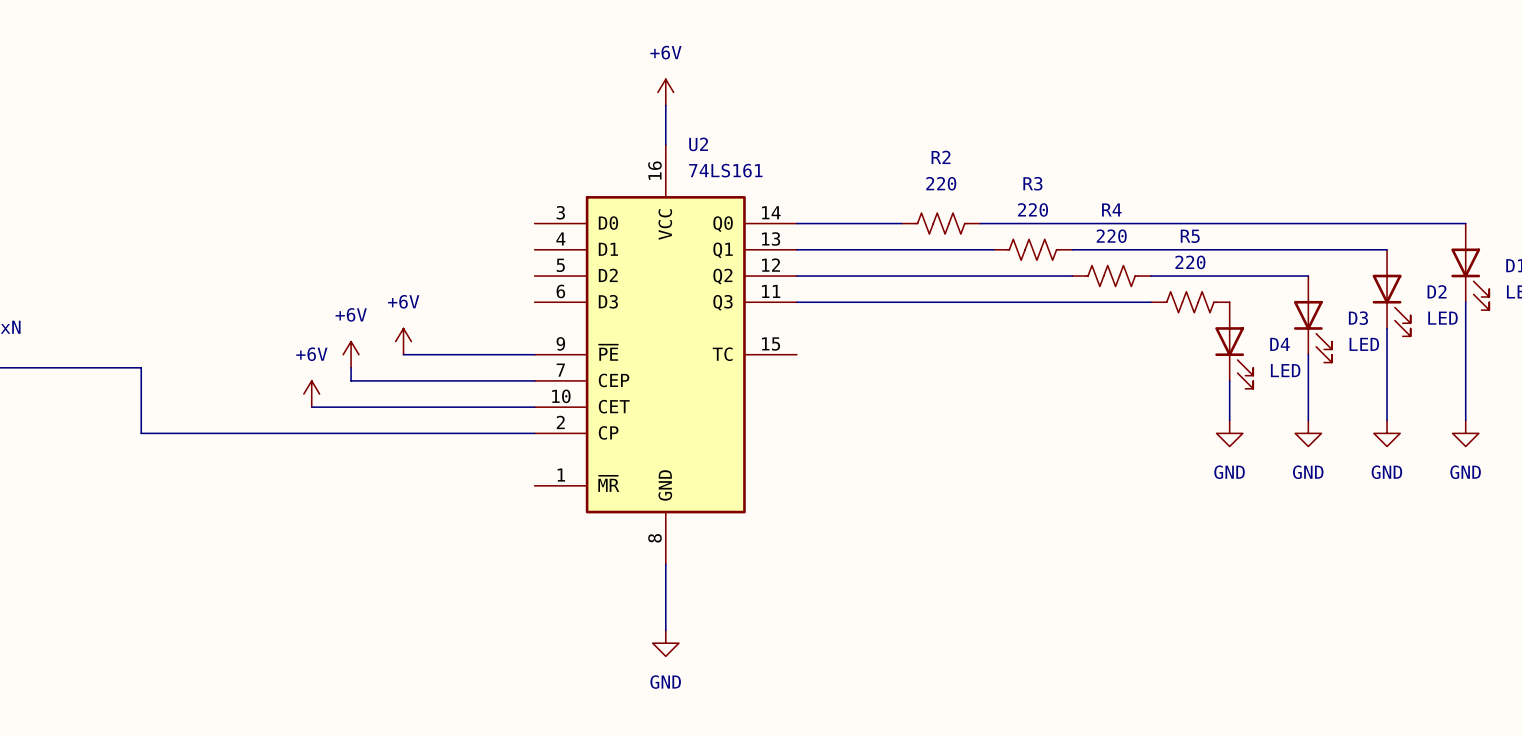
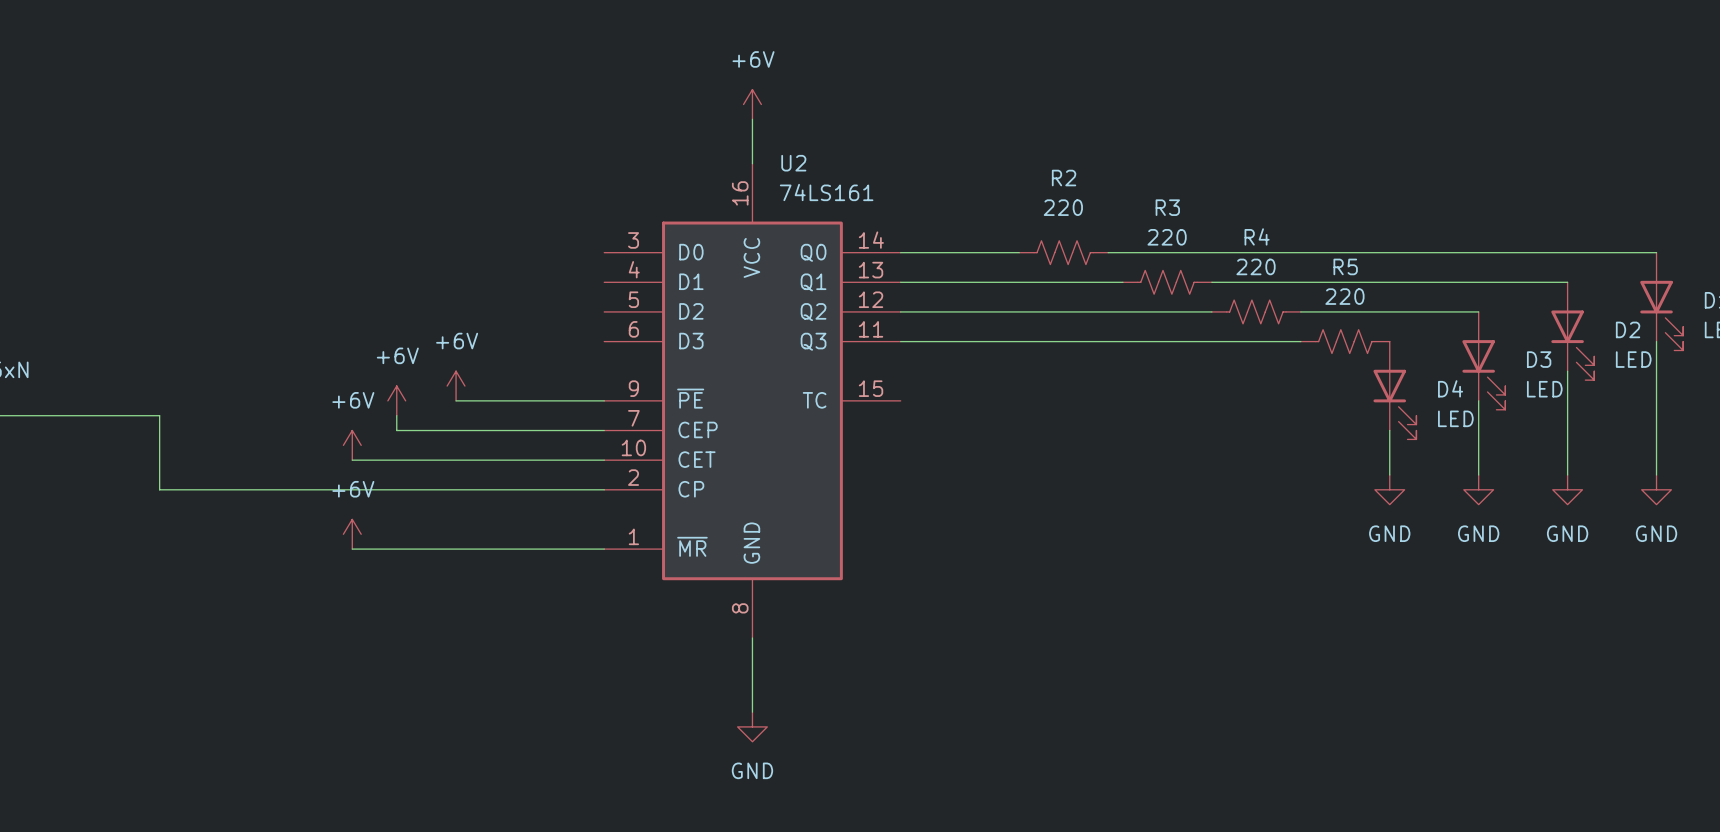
power symbol: none -> +6V (352, 534)
wire: none -> (352, 549) (604, 549)

